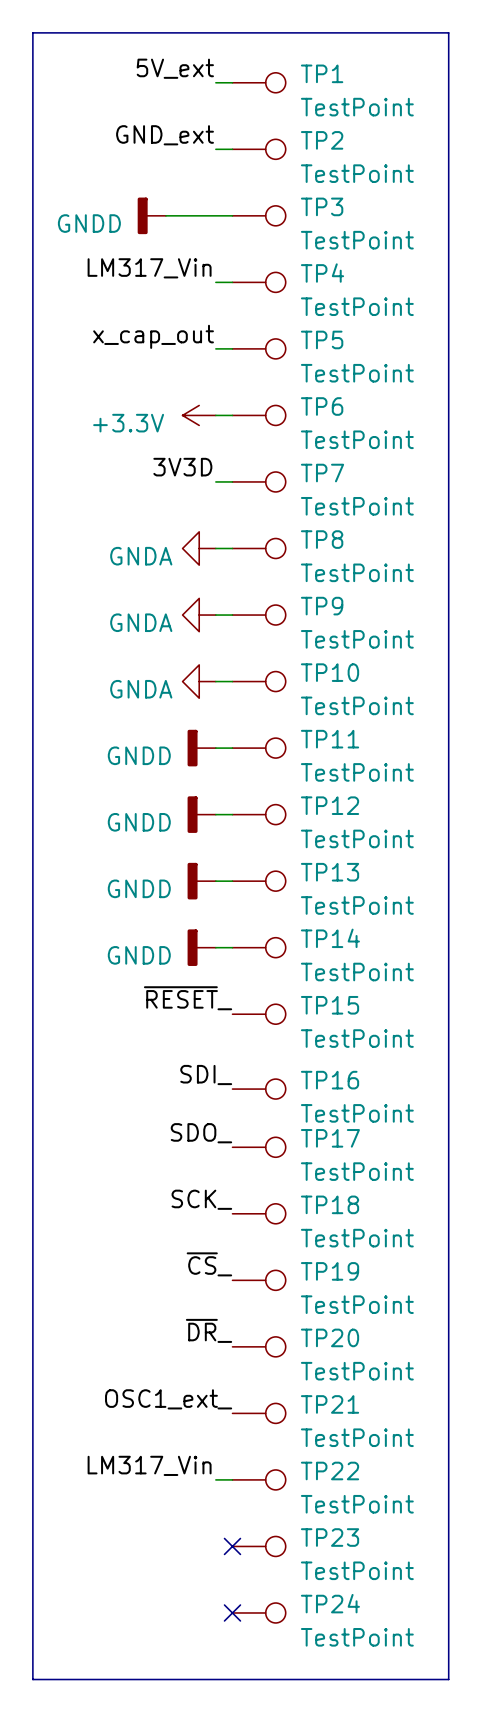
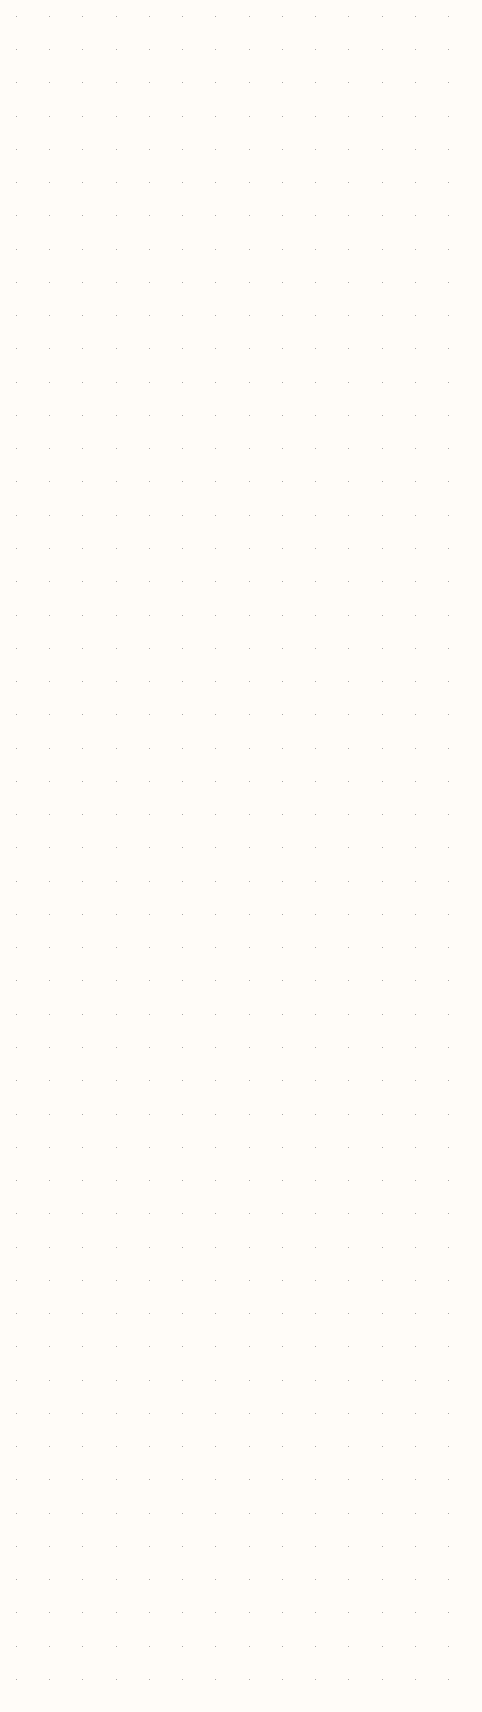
line: (32, 32) (32, 1679) (448, 1679) (448, 32) (32, 32) -> none
label: 5V_ext (175, 68) -> none
wire: (215, 82) (232, 82) -> none
TP1: TestPoint (259, 82) -> none
label: GND_ext (165, 135) -> none
wire: (215, 149) (232, 149) -> none
TP2: TestPoint (259, 149) -> none
power symbol: GNDD (151, 215) -> none
wire: (165, 215) (232, 215) -> none
TP3: TestPoint (259, 215) -> none
label: LM317_Vin (149, 268) -> none
wire: (215, 282) (232, 282) -> none
TP4: TestPoint (259, 282) -> none
label: x_cap_out (153, 336) -> none
wire: (215, 348) (232, 348) -> none
TP5: TestPoint (259, 348) -> none
power symbol: +3.3V (199, 415) -> none
wire: (215, 415) (232, 415) -> none
TP6: TestPoint (259, 415) -> none
label: 3V3D (182, 467) -> none
wire: (215, 481) (232, 481) -> none
TP7: TestPoint (259, 481) -> none
power symbol: GNDA (199, 548) -> none
wire: (215, 548) (232, 548) -> none
TP8: TestPoint (259, 548) -> none
power symbol: GNDA (199, 615) -> none
wire: (215, 615) (232, 615) -> none
TP9: TestPoint (259, 615) -> none
power symbol: GNDA (199, 681) -> none
wire: (215, 681) (232, 681) -> none
TP10: TestPoint (259, 681) -> none
power symbol: GNDD (201, 748) -> none
wire: (215, 748) (232, 748) -> none
TP11: TestPoint (259, 748) -> none
power symbol: GNDD (201, 814) -> none
wire: (215, 814) (232, 814) -> none
TP12: TestPoint (259, 814) -> none
power symbol: GNDD (201, 881) -> none
wire: (215, 881) (232, 881) -> none
TP13: TestPoint (259, 881) -> none
power symbol: GNDD (201, 947) -> none
wire: (215, 947) (232, 947) -> none
TP14: TestPoint (259, 947) -> none
label: ~{RESET}_ (188, 998) -> none
TP15: TestPoint (259, 1014) -> none
label: SDI_ (206, 1075) -> none
TP16: TestPoint (259, 1089) -> none
label: SDO_ (201, 1133) -> none
TP17: TestPoint (259, 1147) -> none
label: SCK_ (201, 1199) -> none
TP18: TestPoint (259, 1213) -> none
label: ~{CS}_ (209, 1264) -> none
TP19: TestPoint (259, 1280) -> none
label: ~{DR}_ (209, 1330) -> none
TP20: TestPoint (259, 1346) -> none
label: OSC1_ext_ (168, 1399) -> none
TP21: TestPoint (259, 1413) -> none
label: LM317_Vin (149, 1465) -> none
wire: (215, 1479) (232, 1479) -> none
TP22: TestPoint (259, 1479) -> none
no-connect mark: (232, 1546) -> none
TP23: TestPoint (259, 1546) -> none
no-connect mark: (232, 1612) -> none
TP24: TestPoint (259, 1612) -> none

